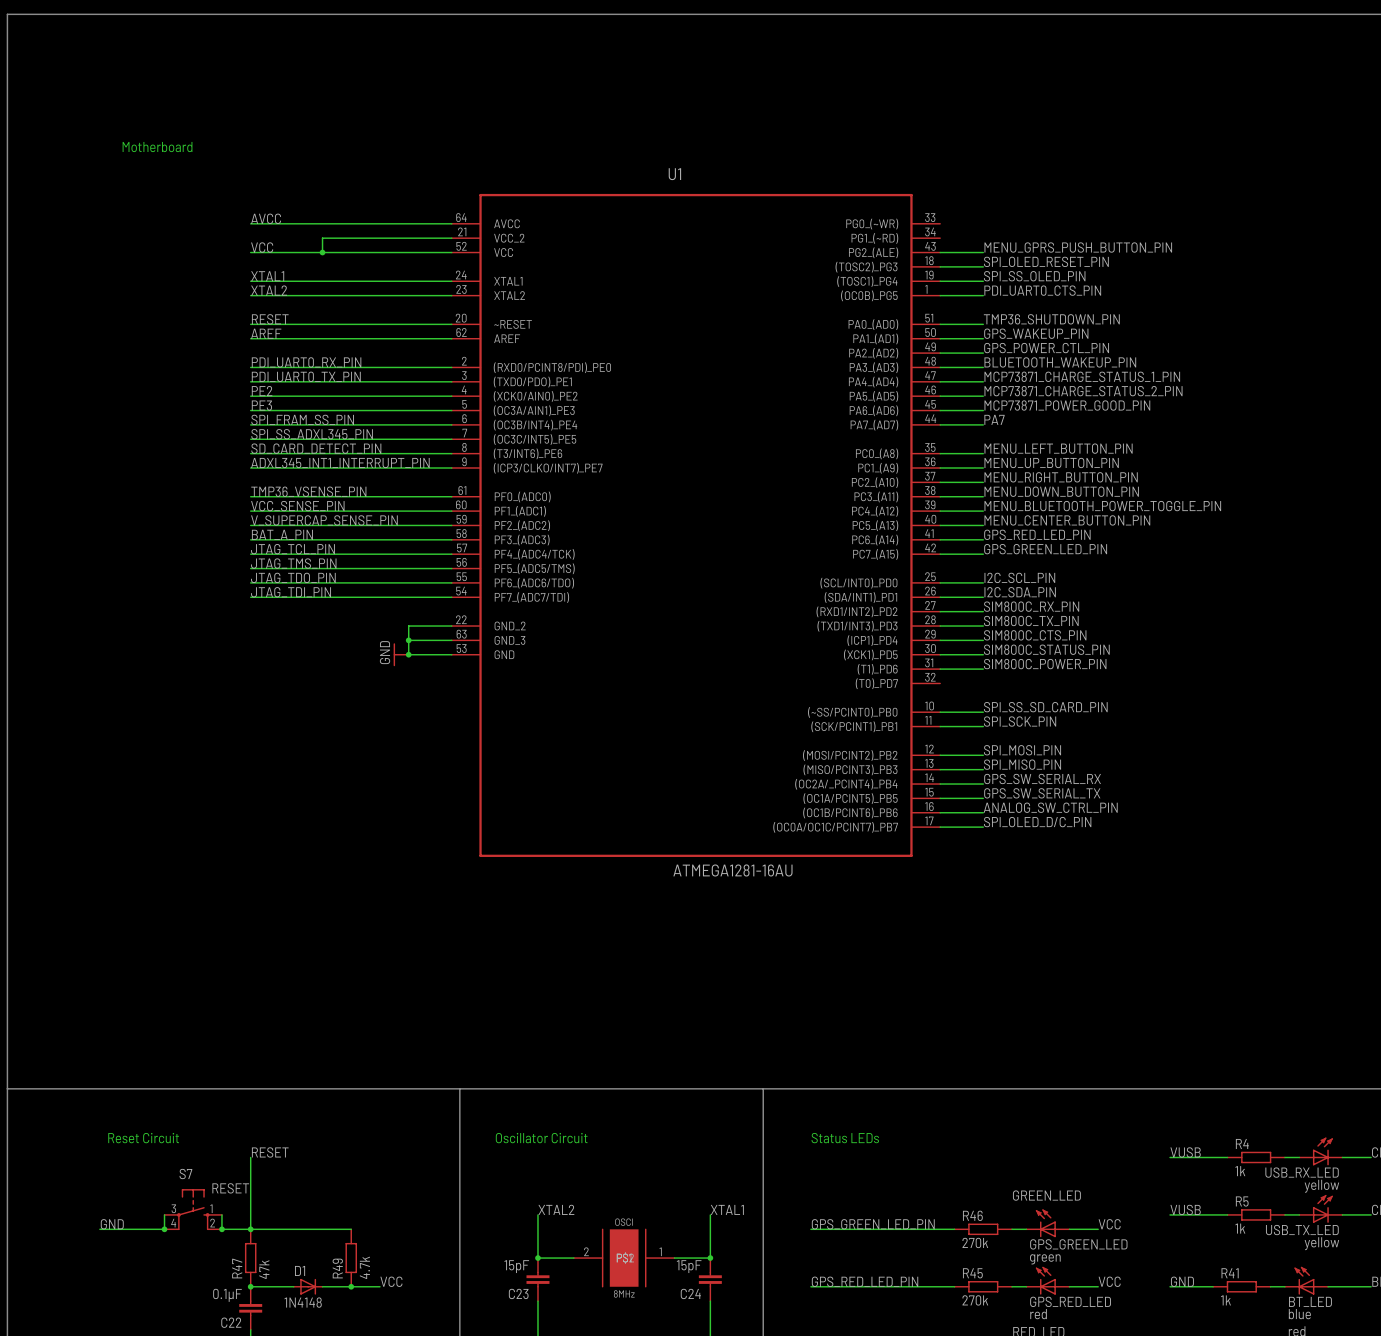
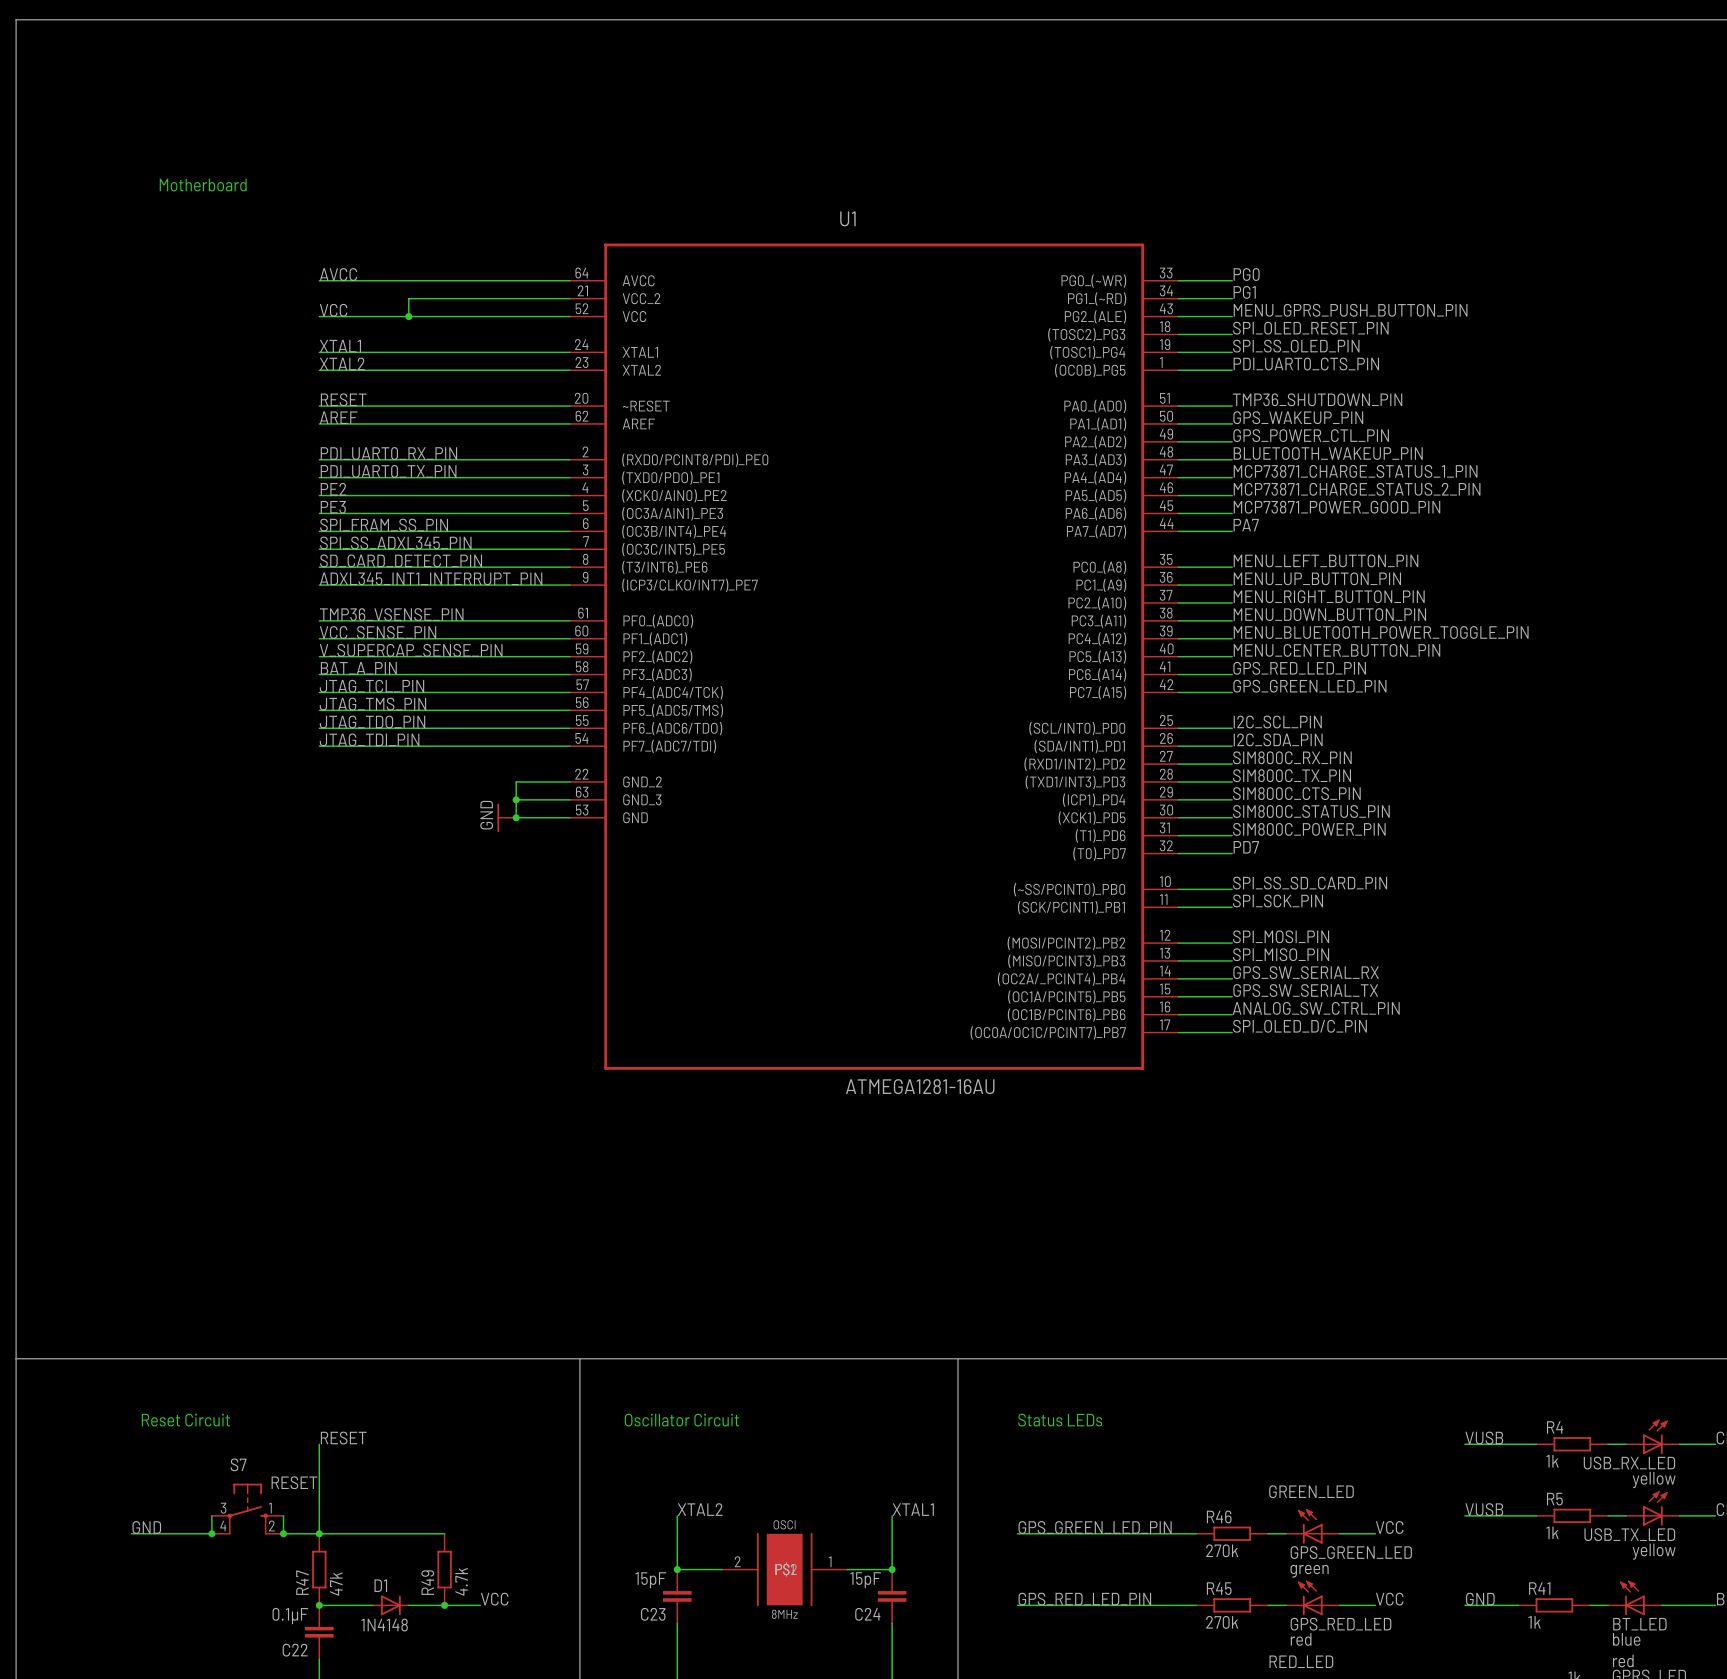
label: none -> PG0 (1246, 274)
wire: none -> (1178, 280) (1232, 280)
label: none -> PG1 (1244, 292)
wire: none -> (1178, 298) (1232, 298)
label: none -> PD7 (1246, 847)
wire: none -> (1178, 853) (1232, 853)

